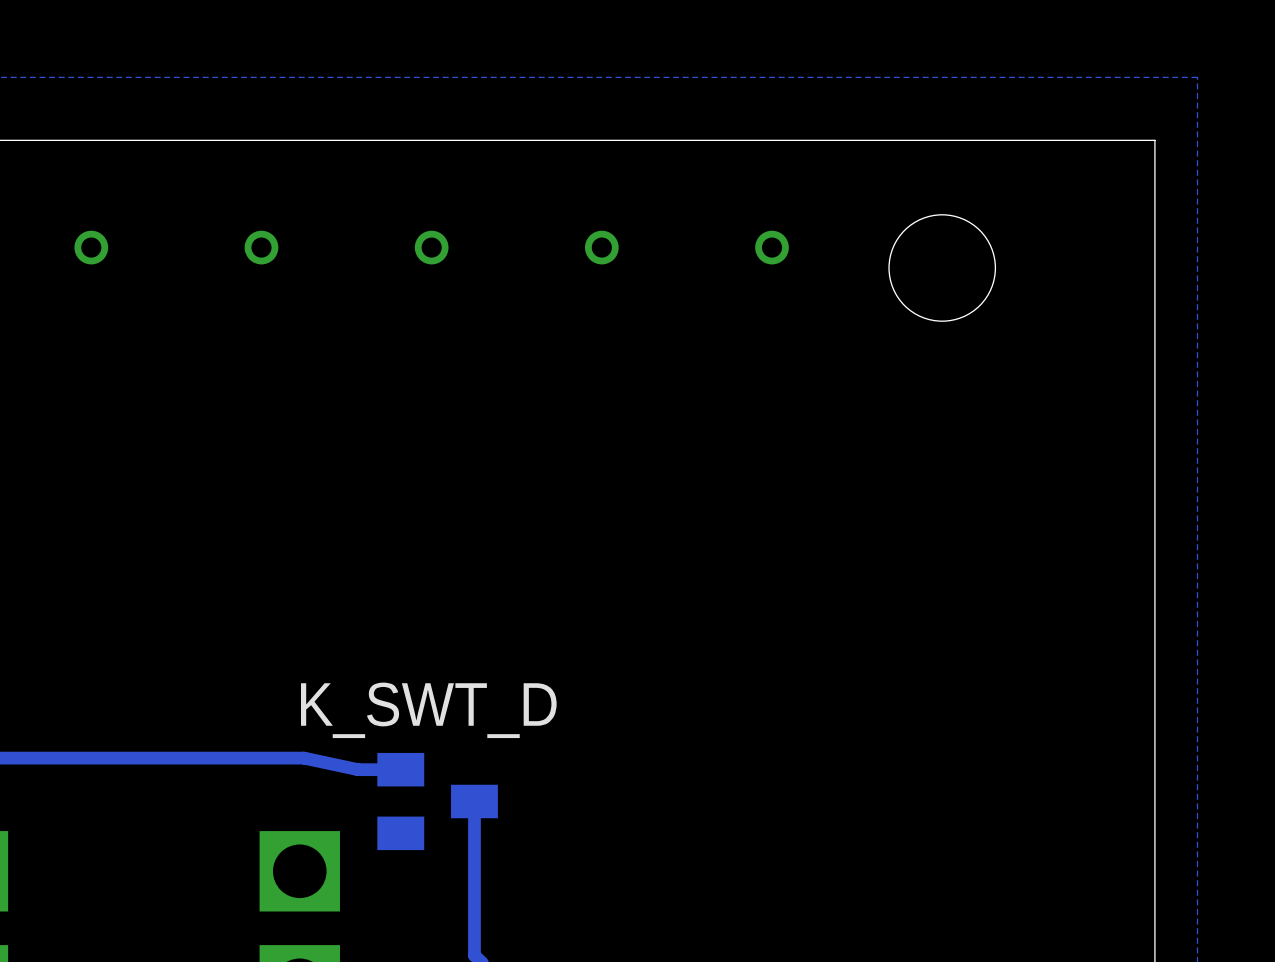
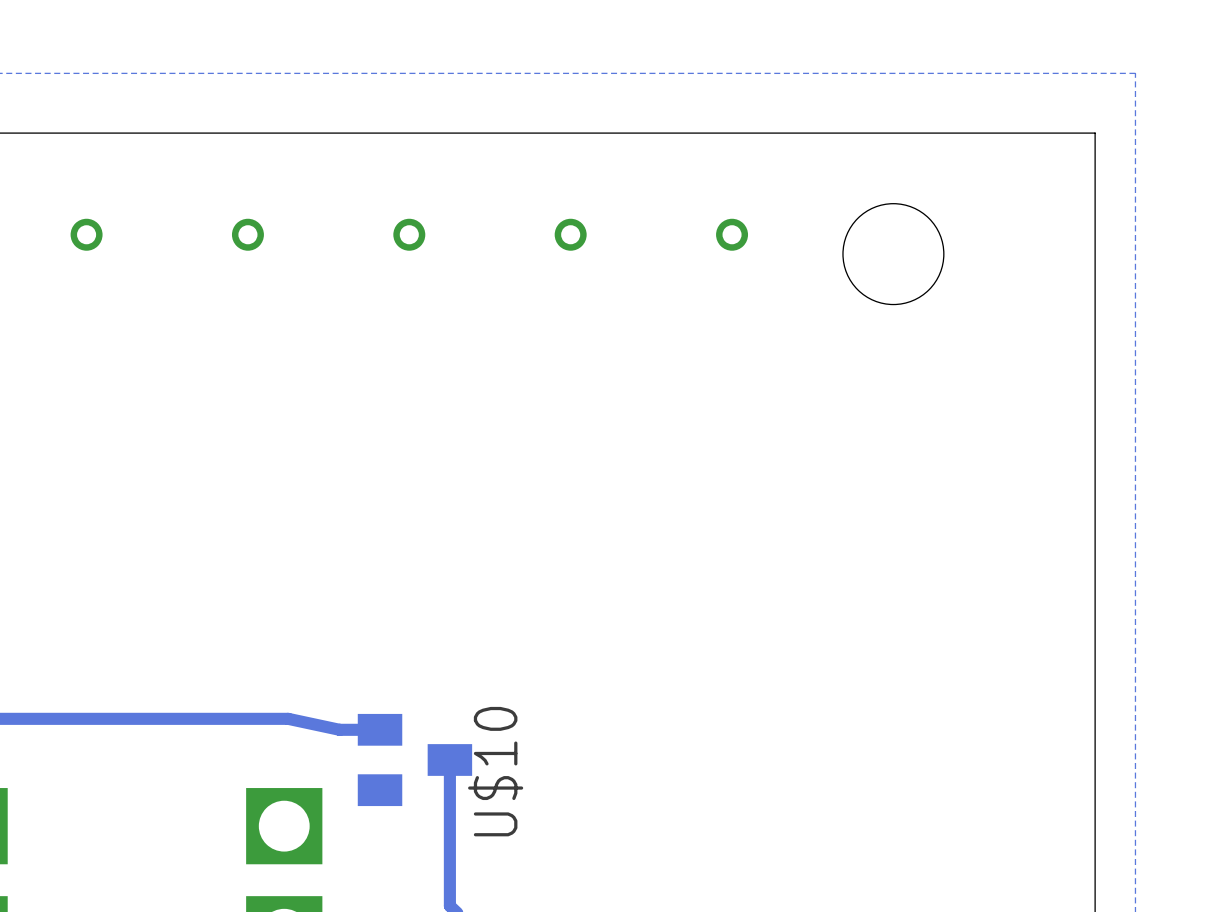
K_SWT_D name: K_SWT_D (428, 710) -> U$10 (495, 771)

